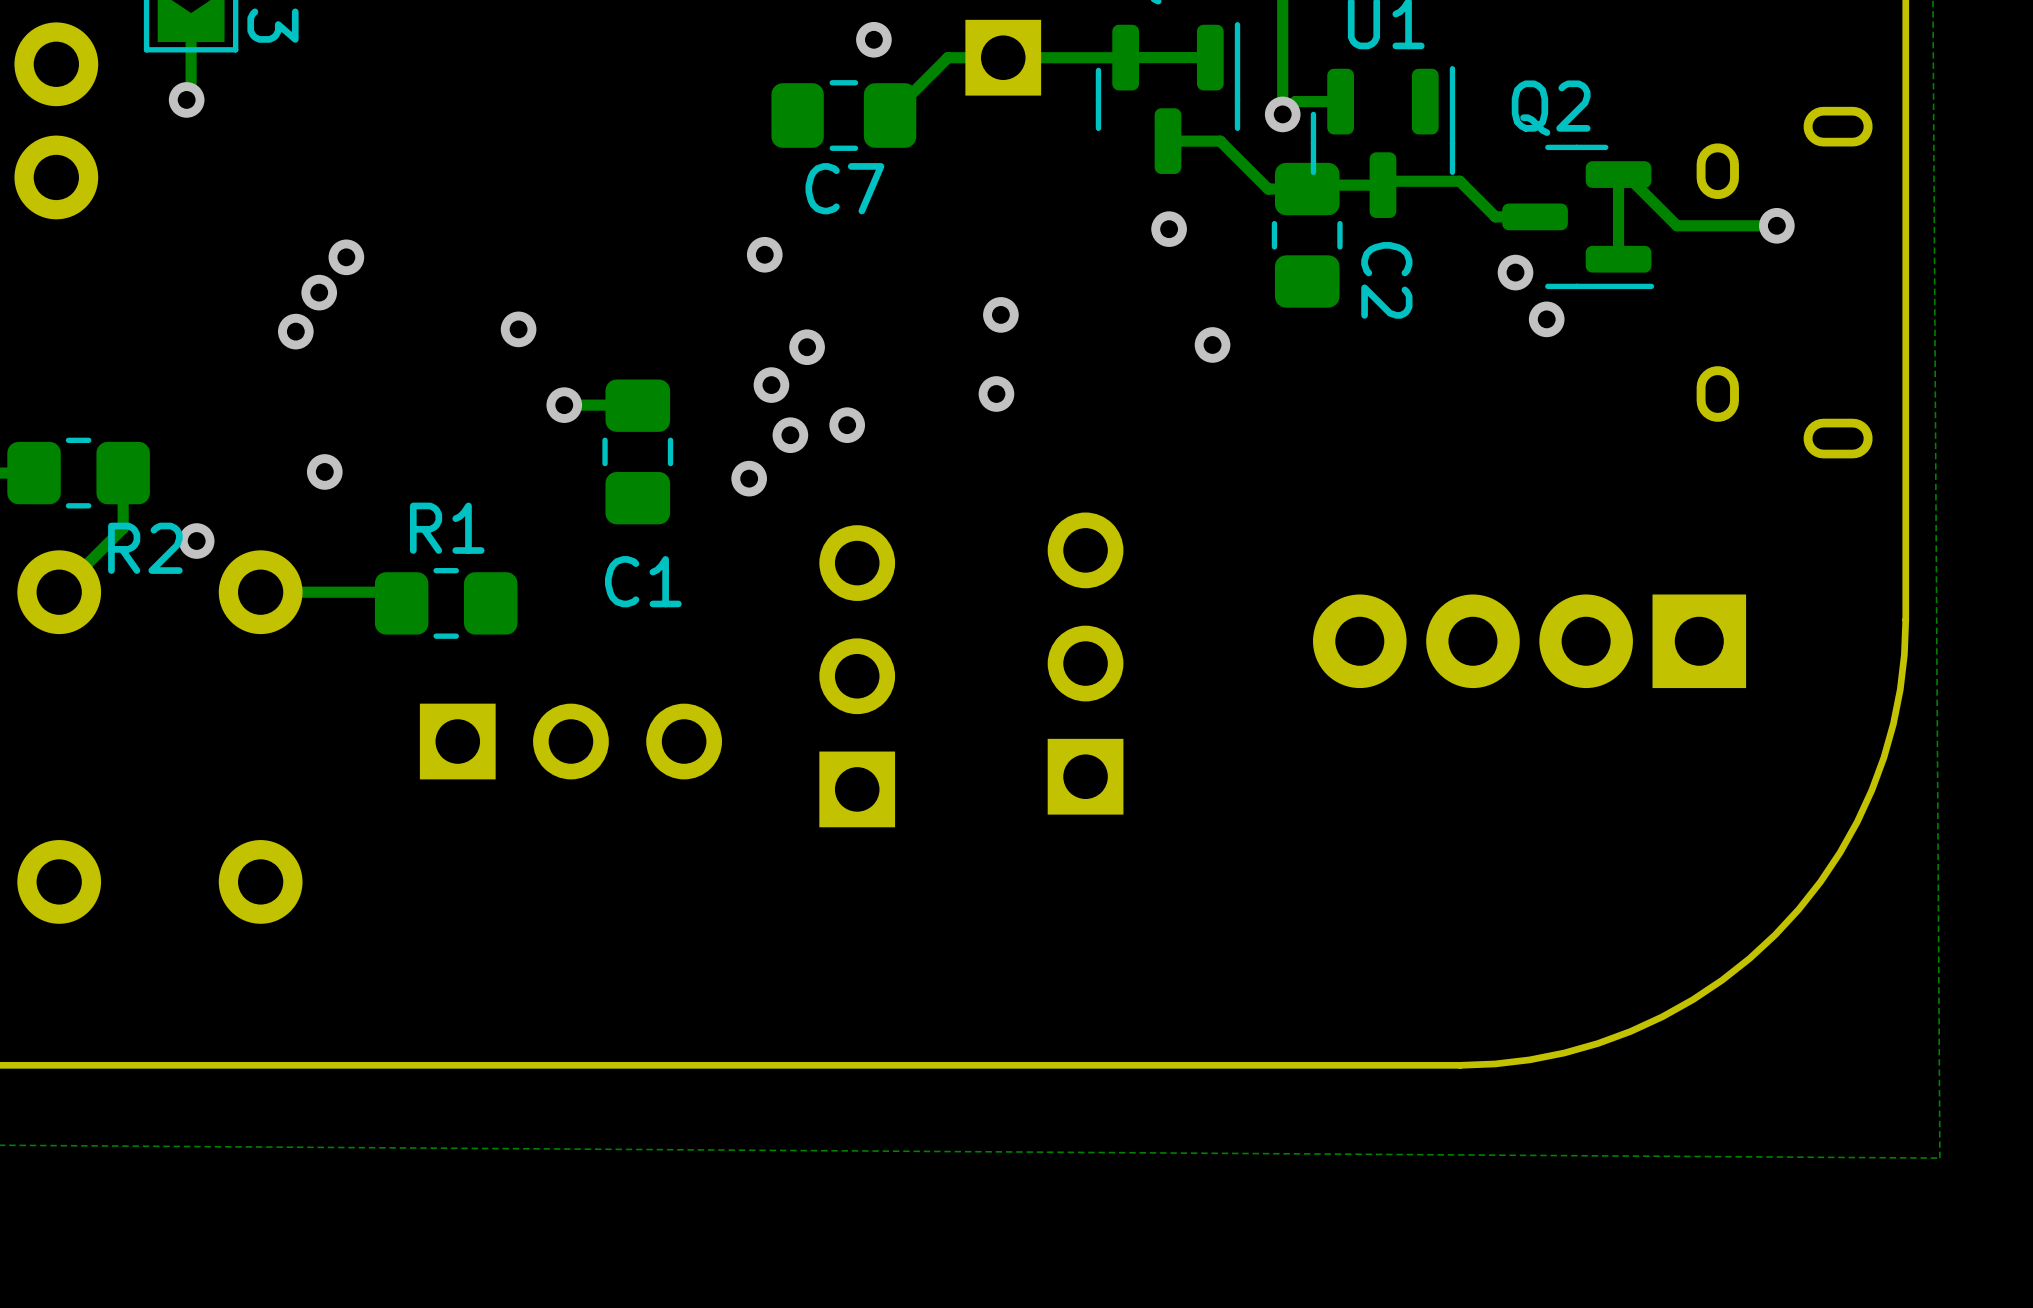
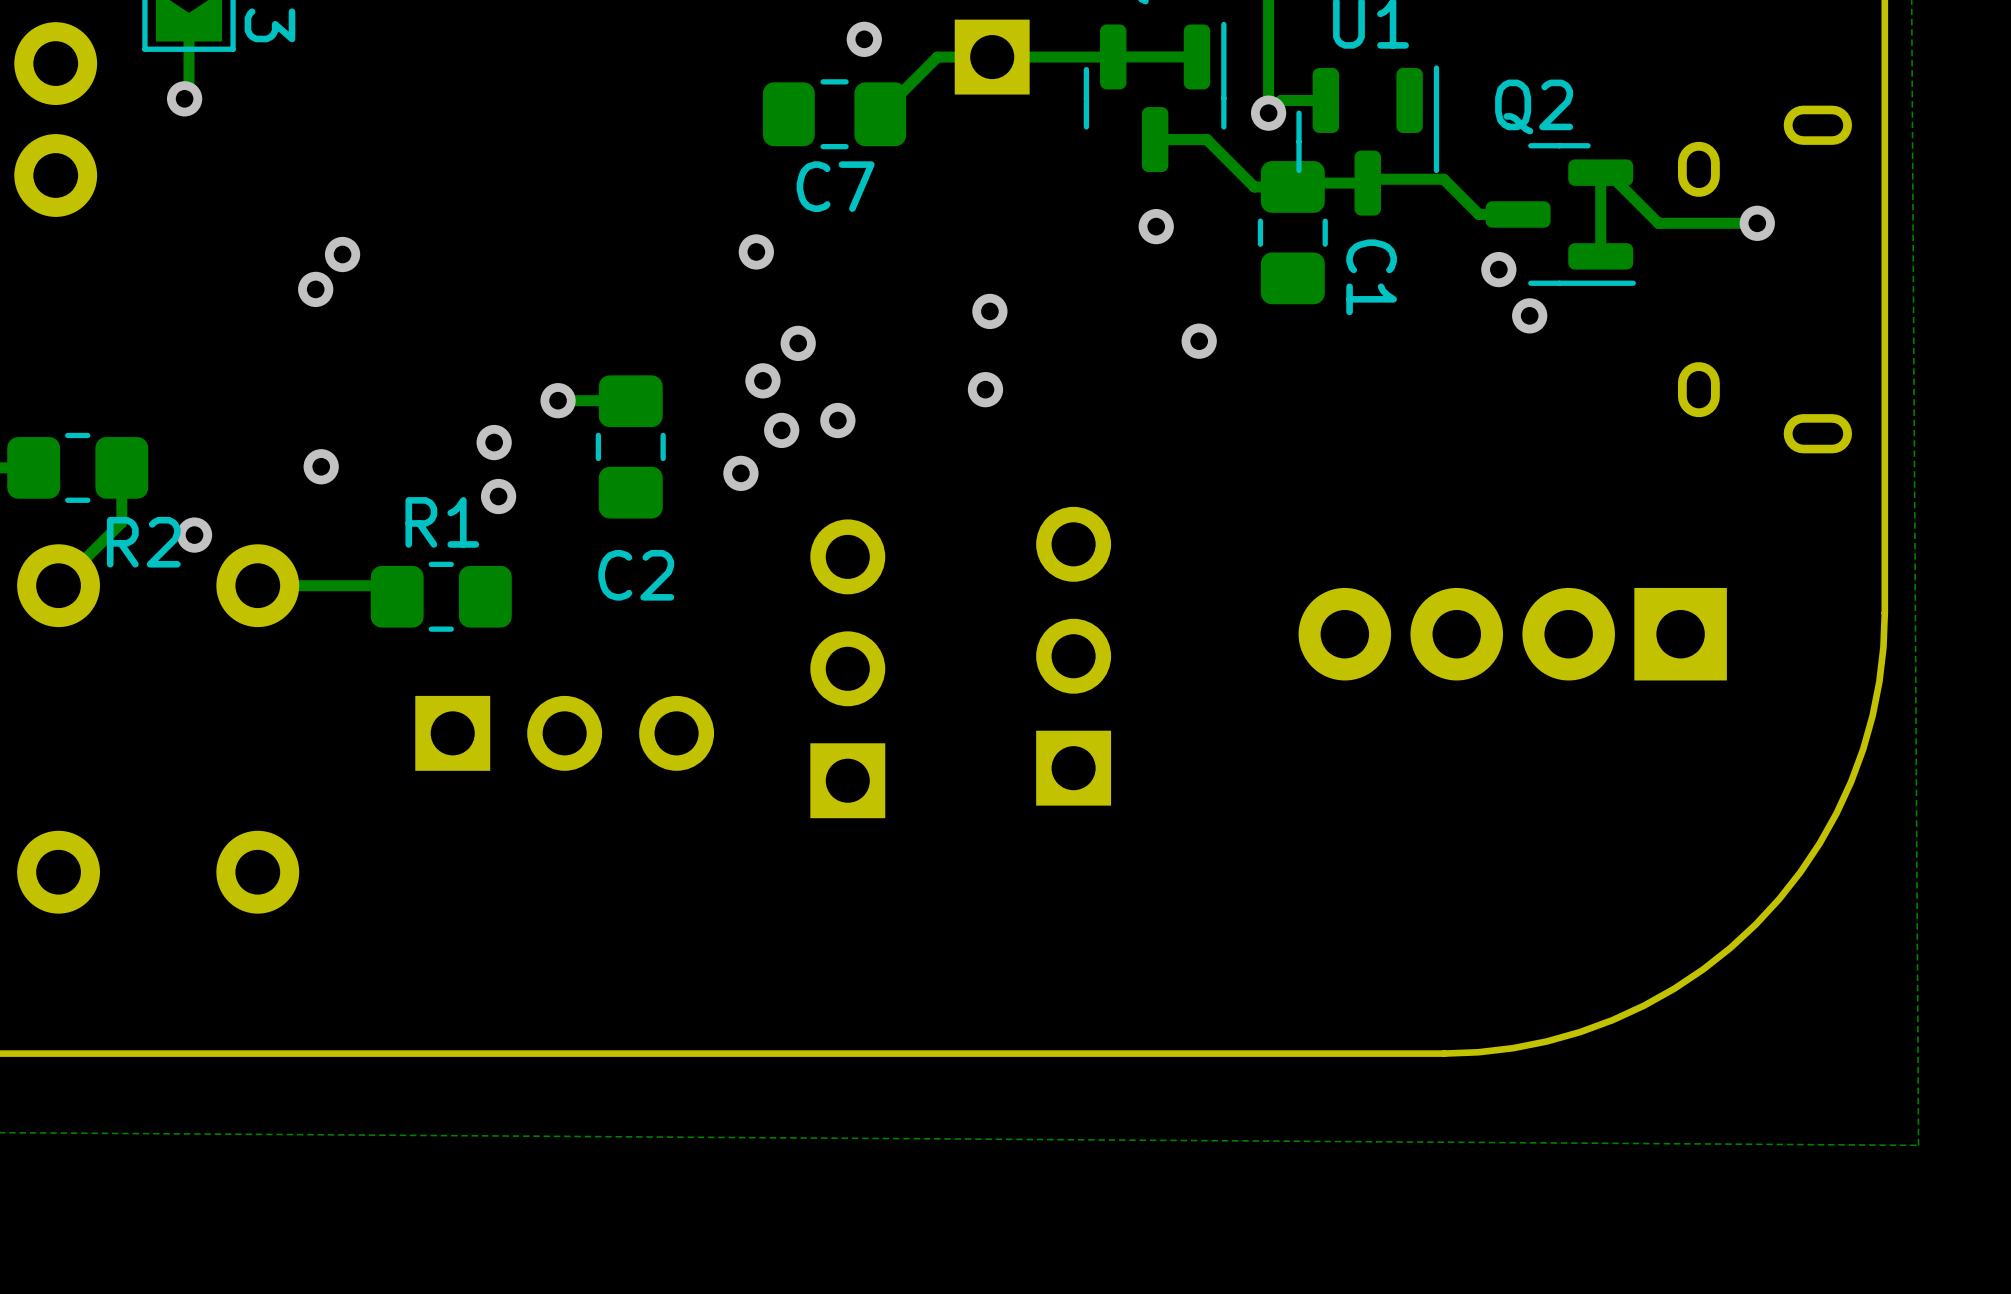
C2 name: C2 (1386, 280) -> C1 (1371, 277)
via: (518, 329) -> none
via: (295, 331) -> none
via: none -> (494, 442)
via: none -> (498, 496)
C1 name: C1 (643, 581) -> C2 (636, 575)

